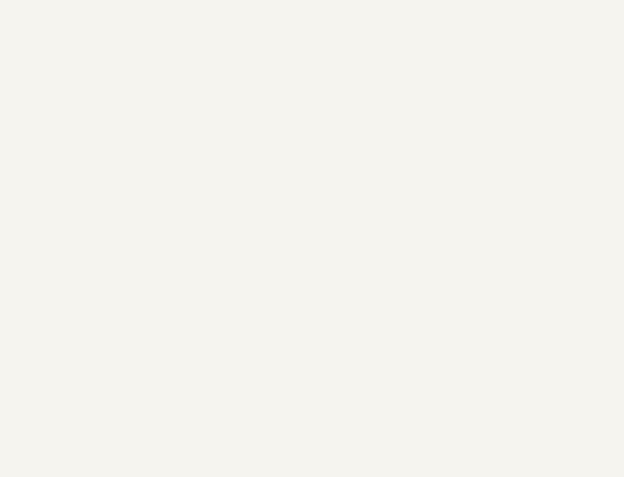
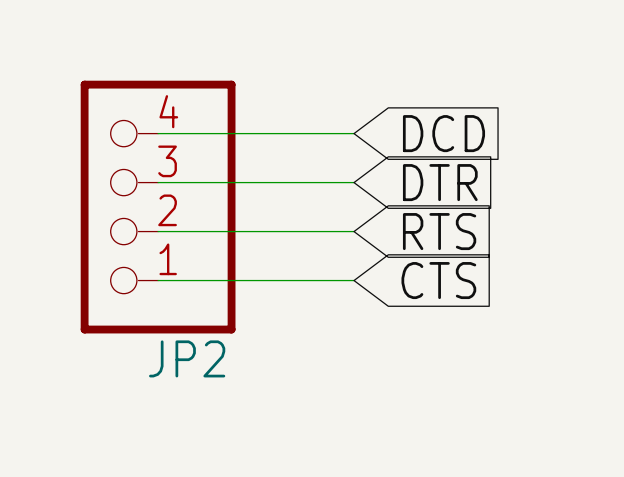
wire: none -> (158, 133) (354, 133)
global label: none -> DCD (443, 133)
wire: none -> (158, 182) (354, 182)
global label: none -> DTR (440, 182)
JP2: none -> (158, 207)
wire: none -> (158, 231) (354, 231)
global label: none -> RTS (439, 231)
wire: none -> (158, 280) (354, 280)
global label: none -> CTS (438, 280)

